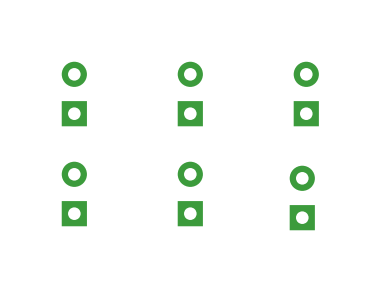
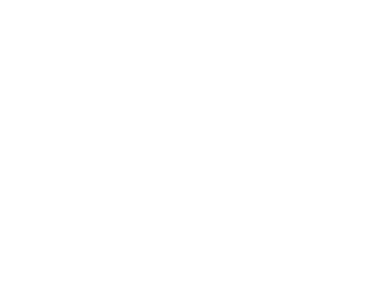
part: (74, 94) -> none
part: (190, 94) -> none
part: (306, 94) -> none
part: (74, 193) -> none
part: (190, 193) -> none
part: (302, 197) -> none

